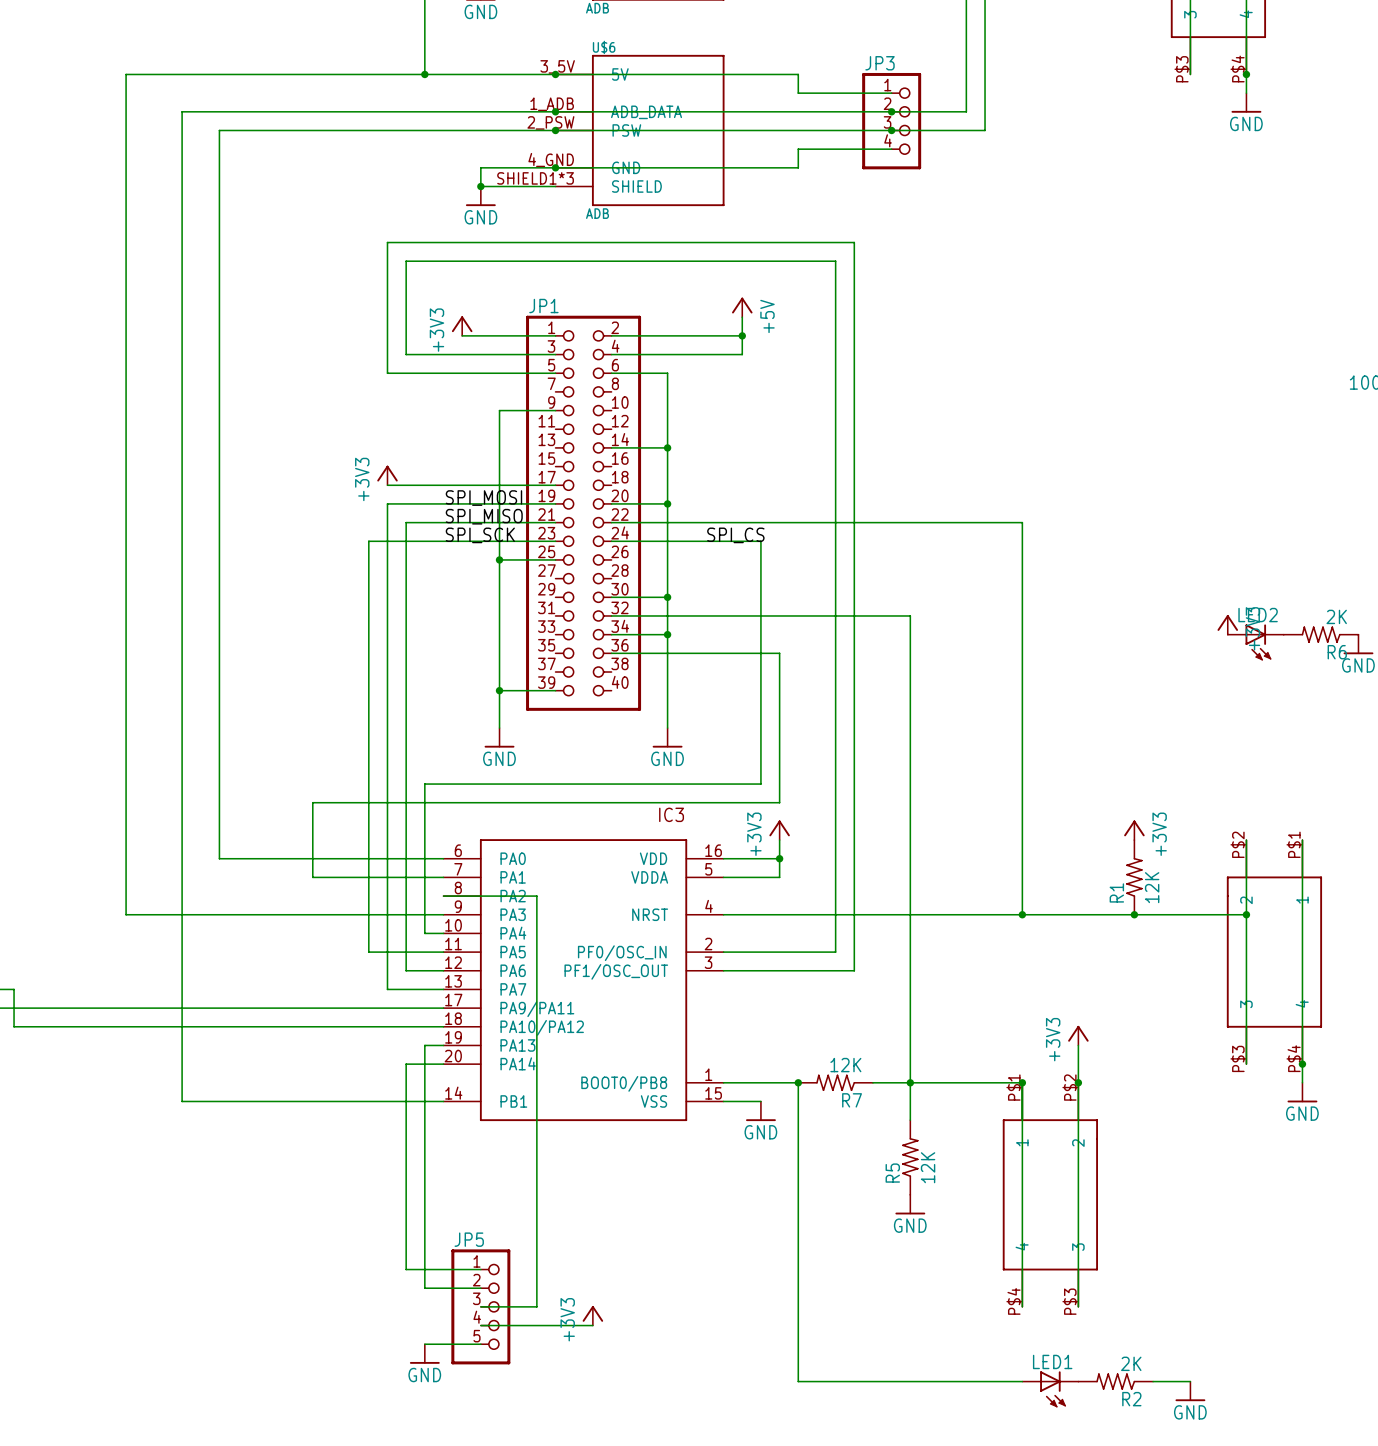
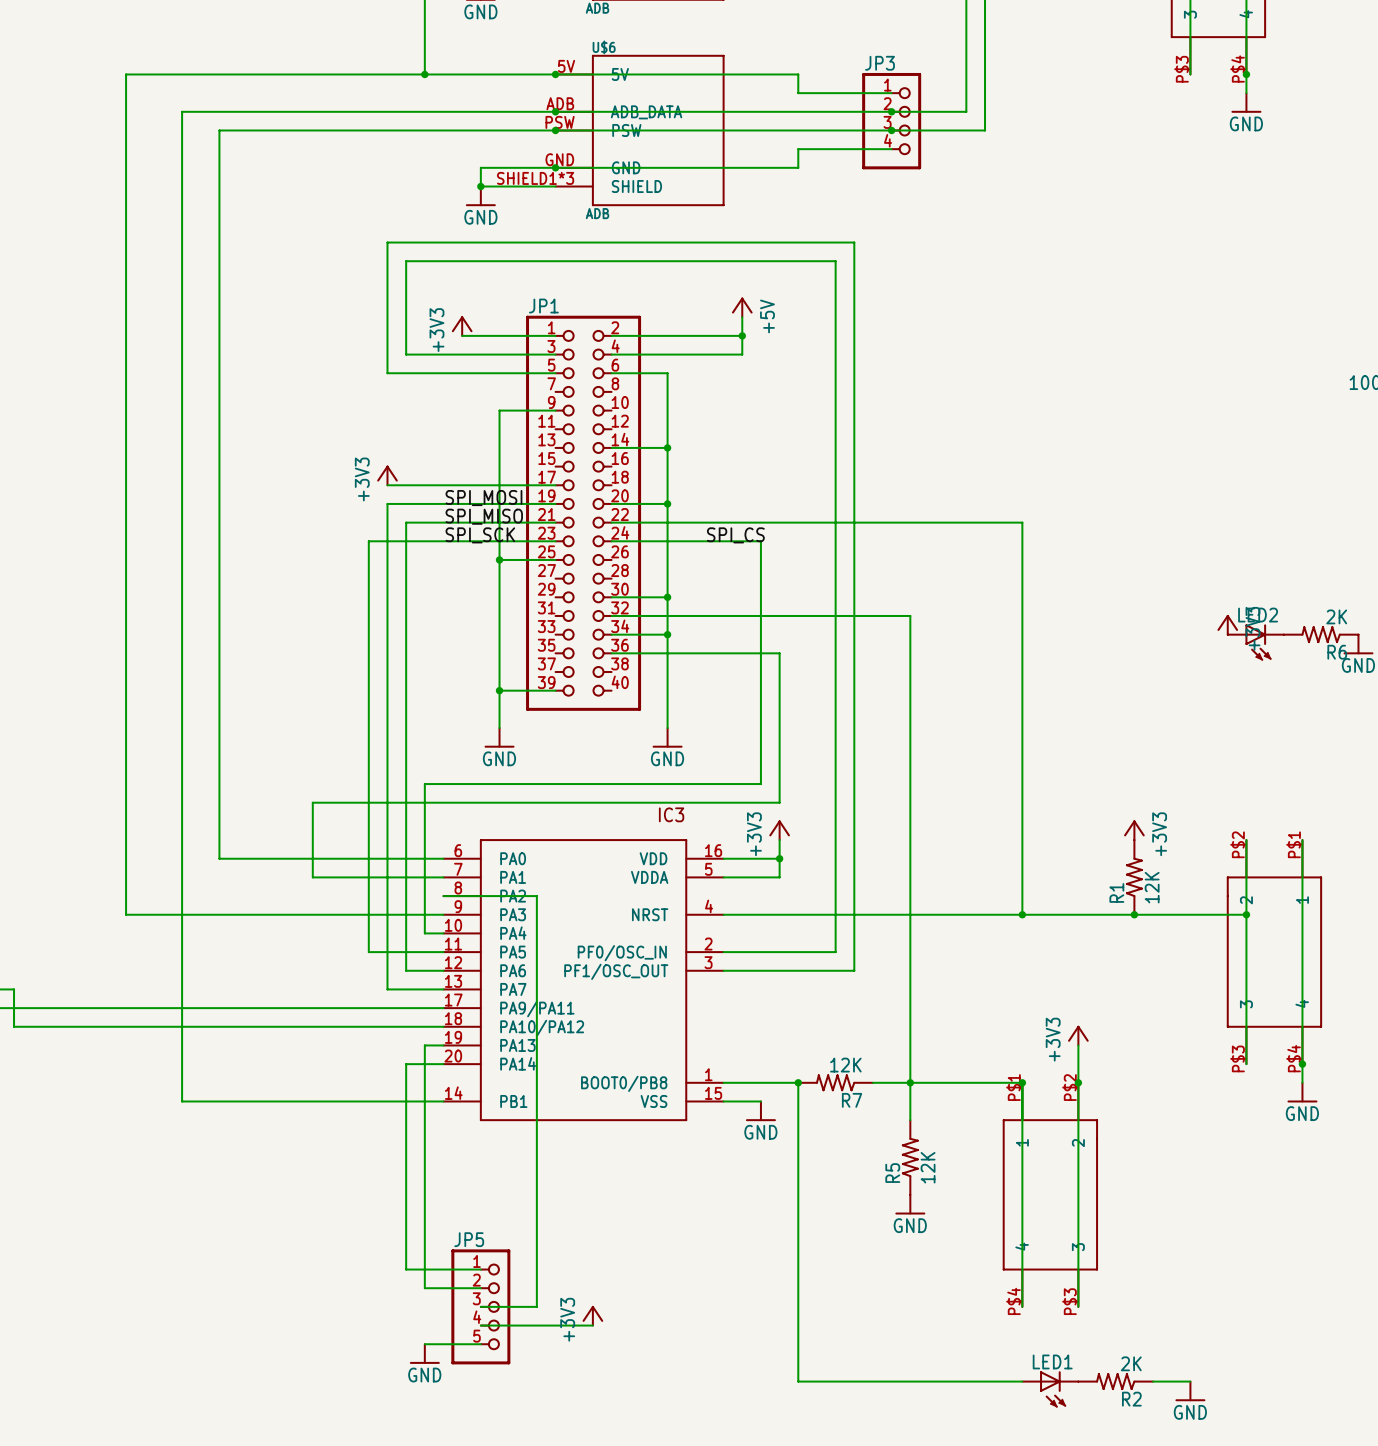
U$6 pin number: 3_5V (557, 66) -> 5V (566, 66)
U$6 pin number: 1_ADB (552, 104) -> ADB (560, 103)
U$6 pin number: 2_PSW (550, 122) -> PSW (560, 122)
U$6 pin number: 4_GND (551, 160) -> GND (559, 159)

